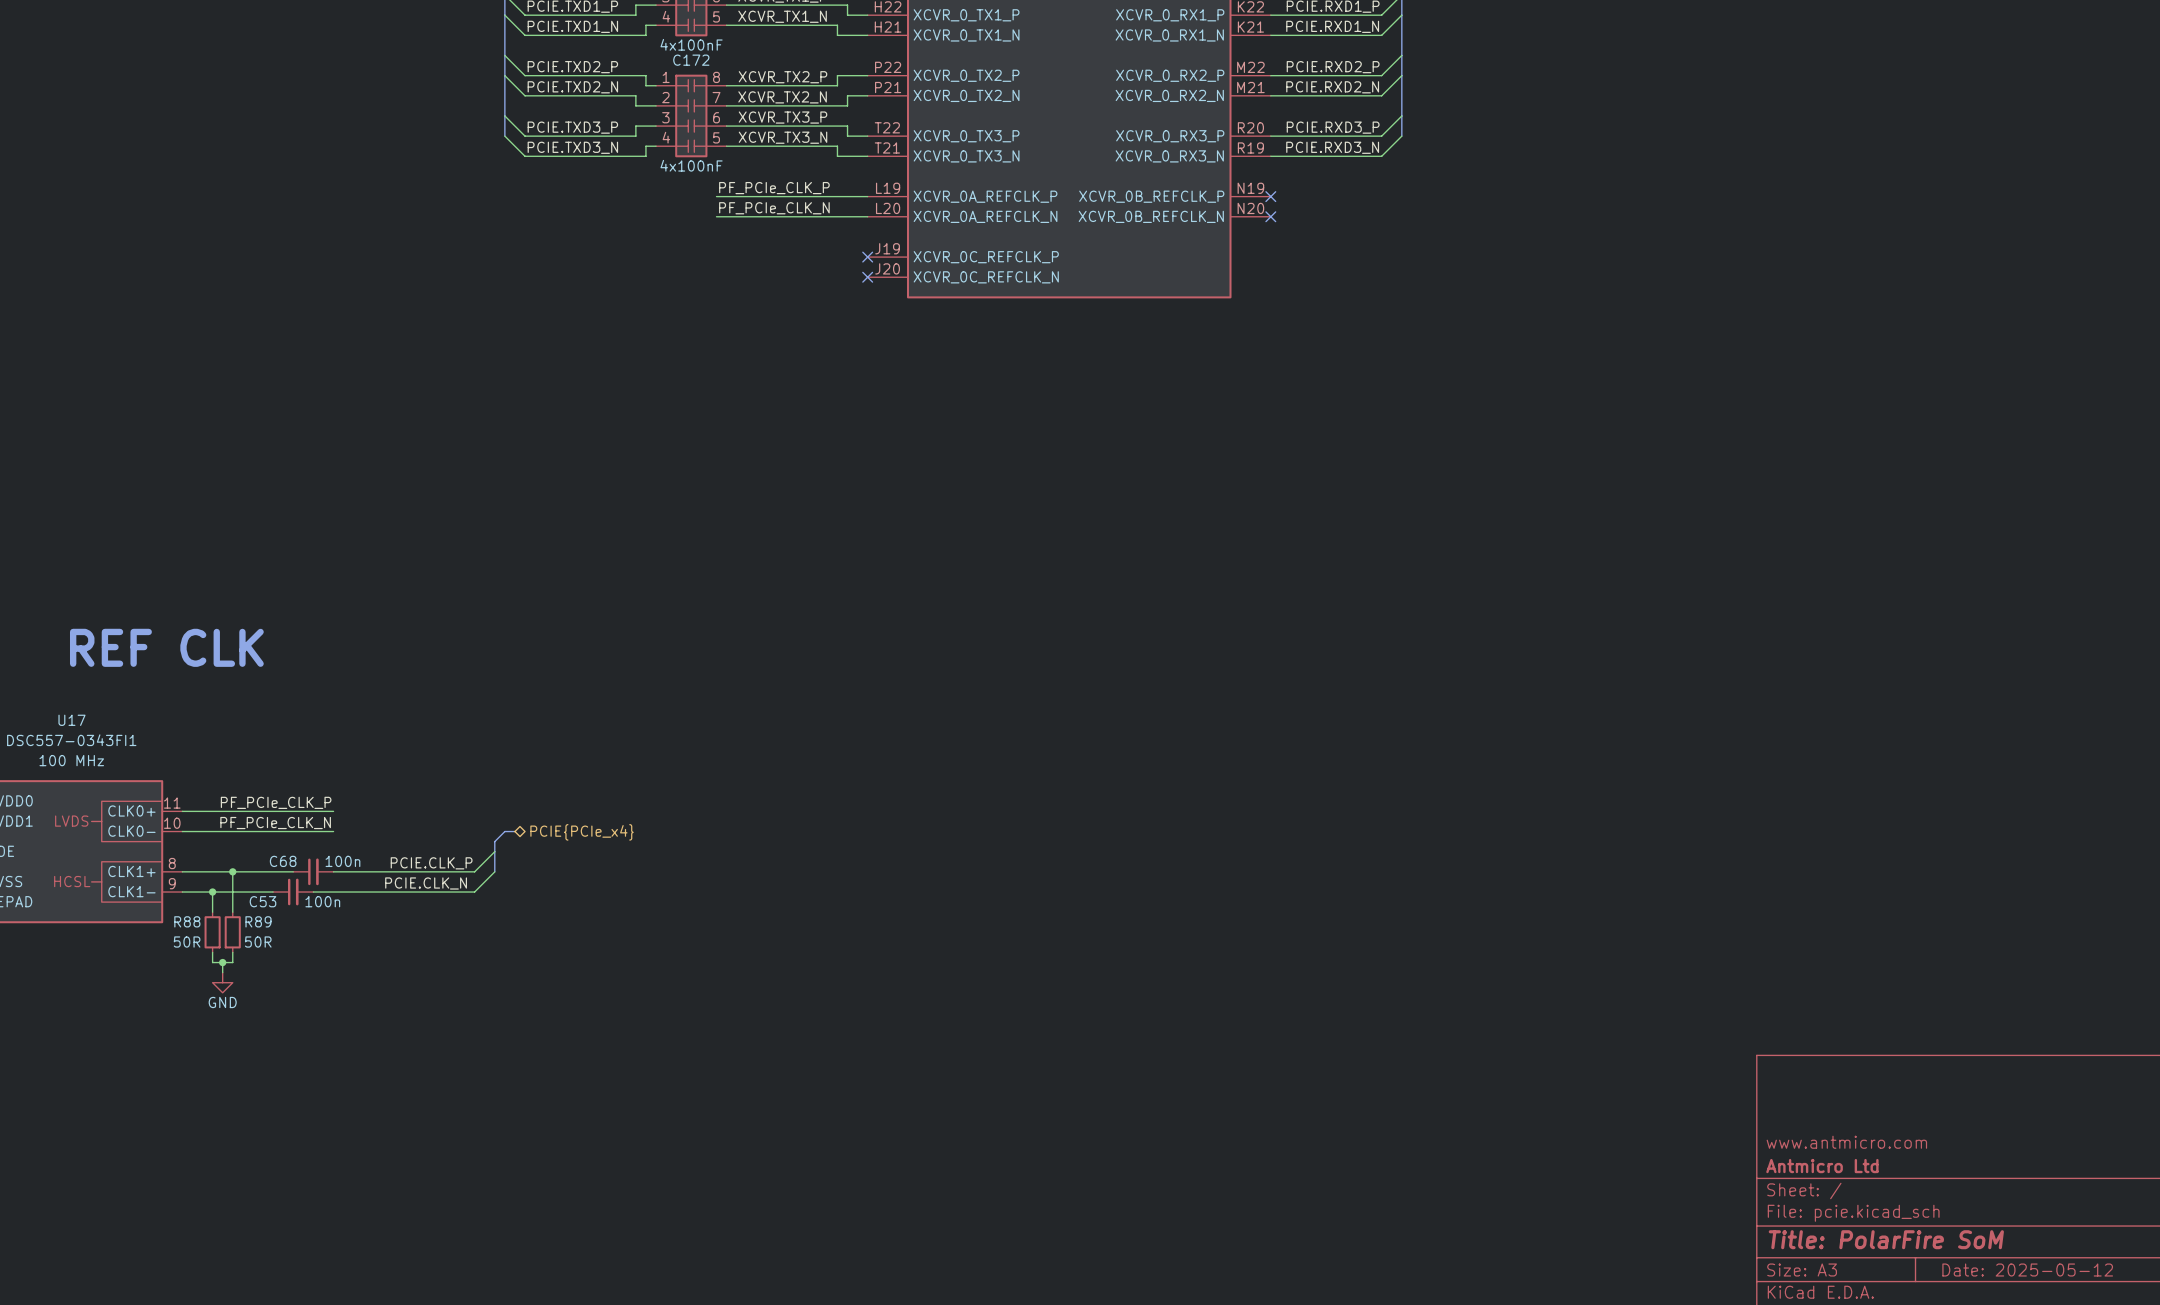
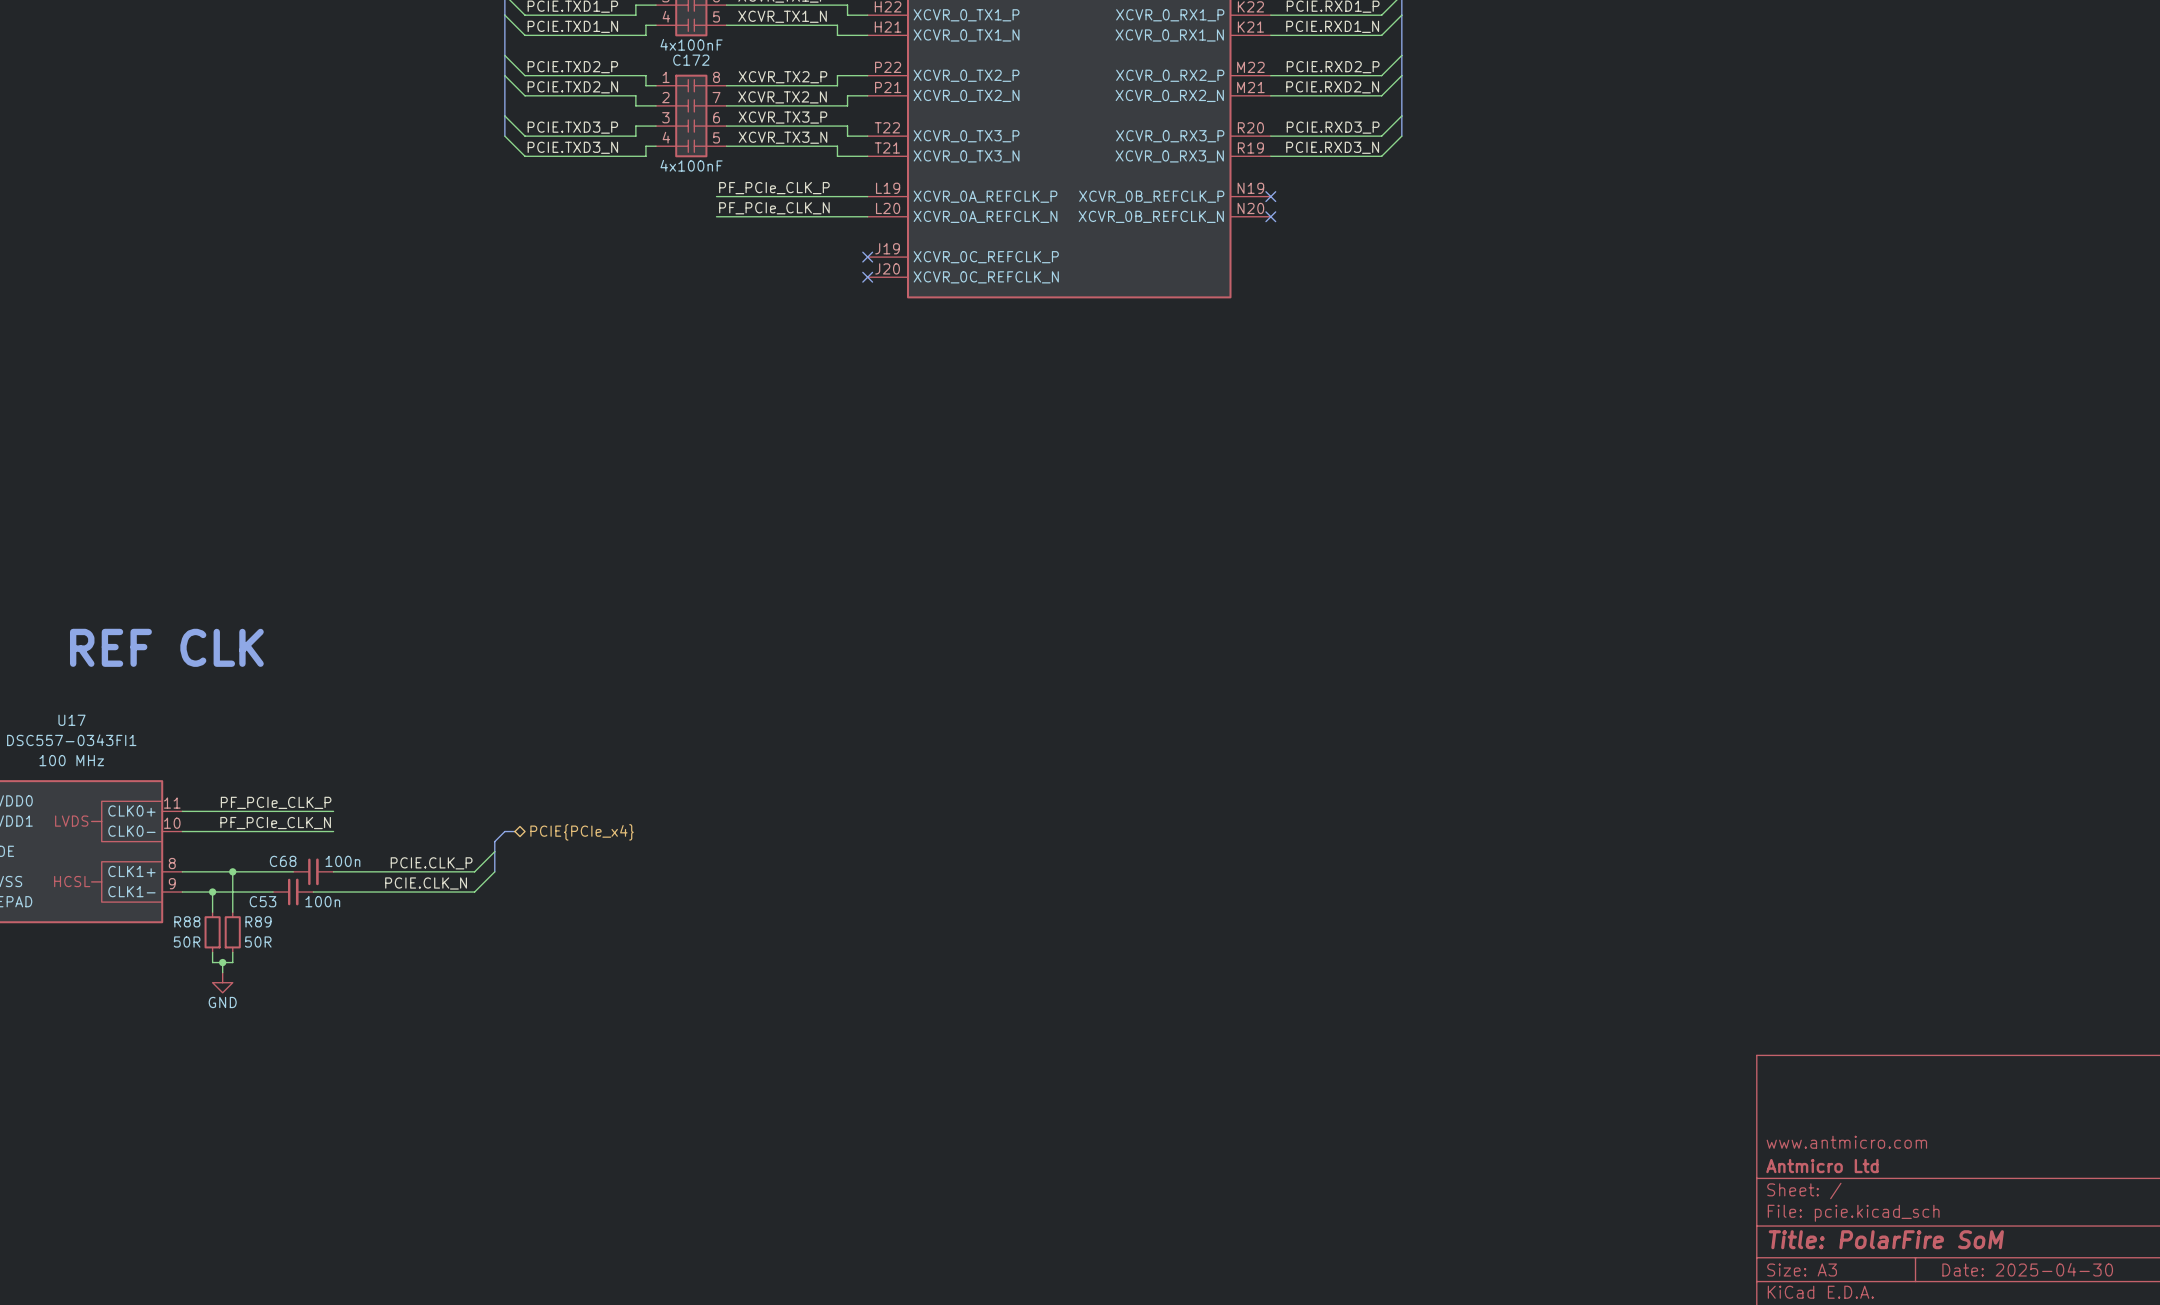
title block: Date: 2025-05-12 (2027, 1270) -> Date: 2025-04-30 (2027, 1269)

